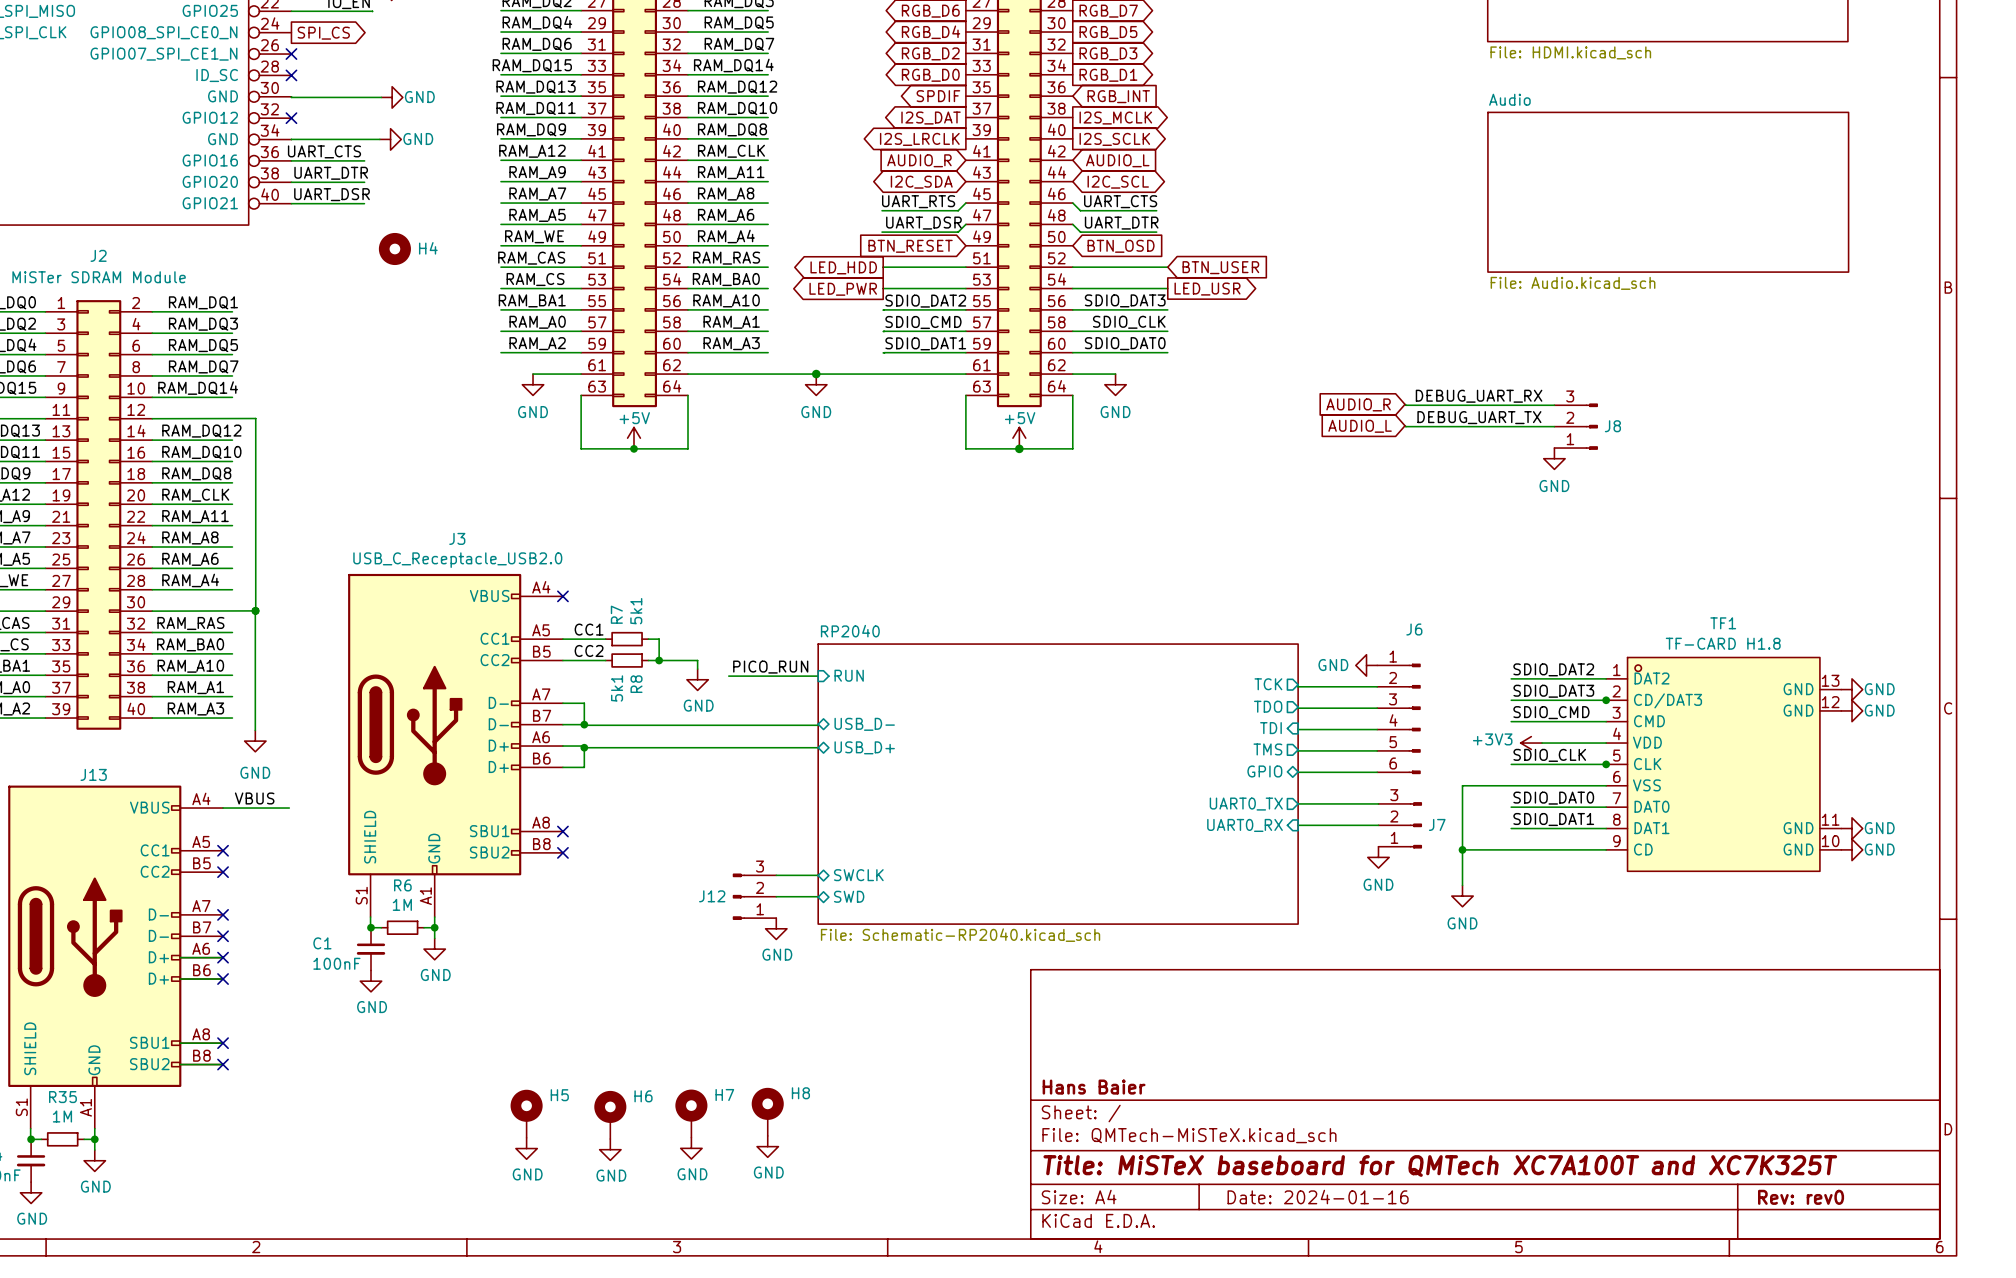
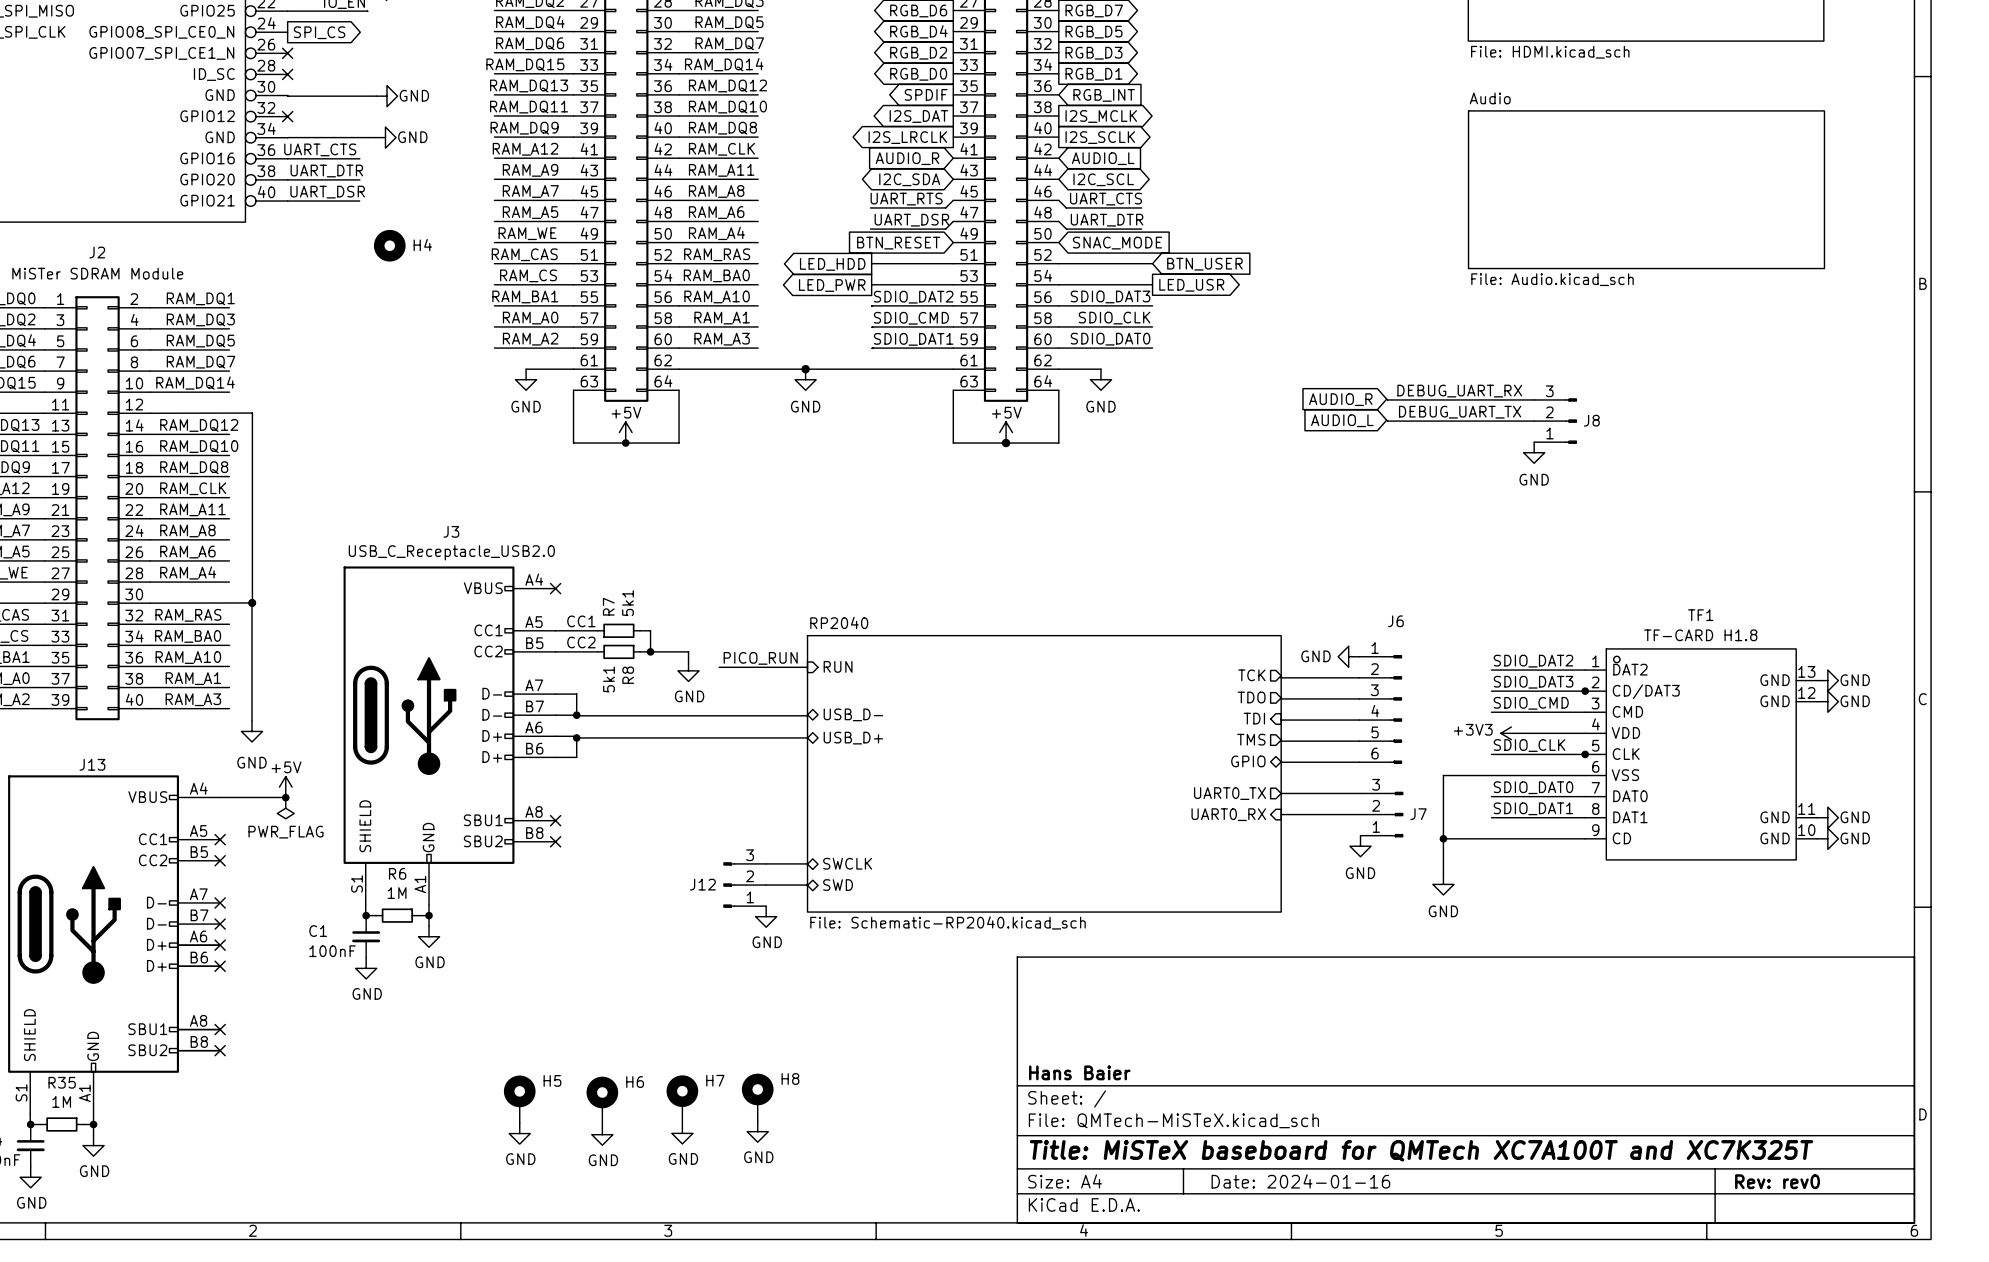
global label: BTN_OSD (1121, 246) -> SNAC_MODE (1117, 243)
power symbol: none -> +5V (285, 787)
label: VBUS (254, 798) -> none
junction: none -> (285, 797)
power symbol: none -> PWR_FLAG (285, 808)

